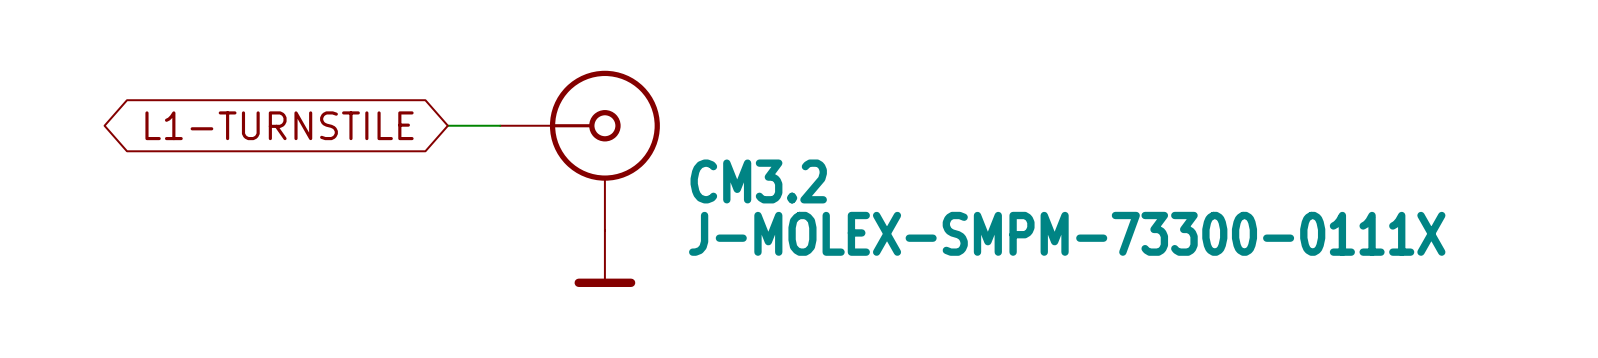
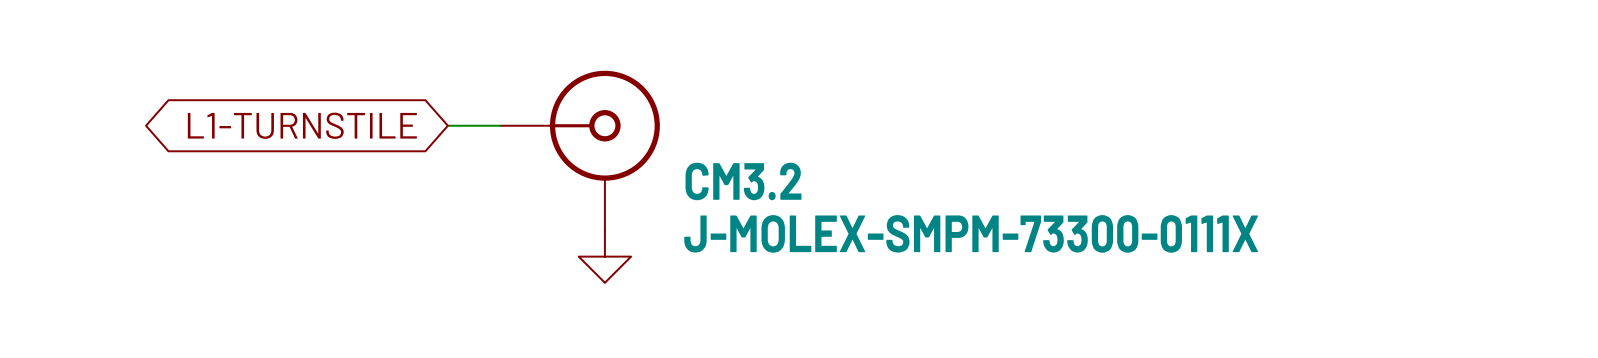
power symbol shape: [574, 230, 636, 287] -> [578, 230, 632, 283]

